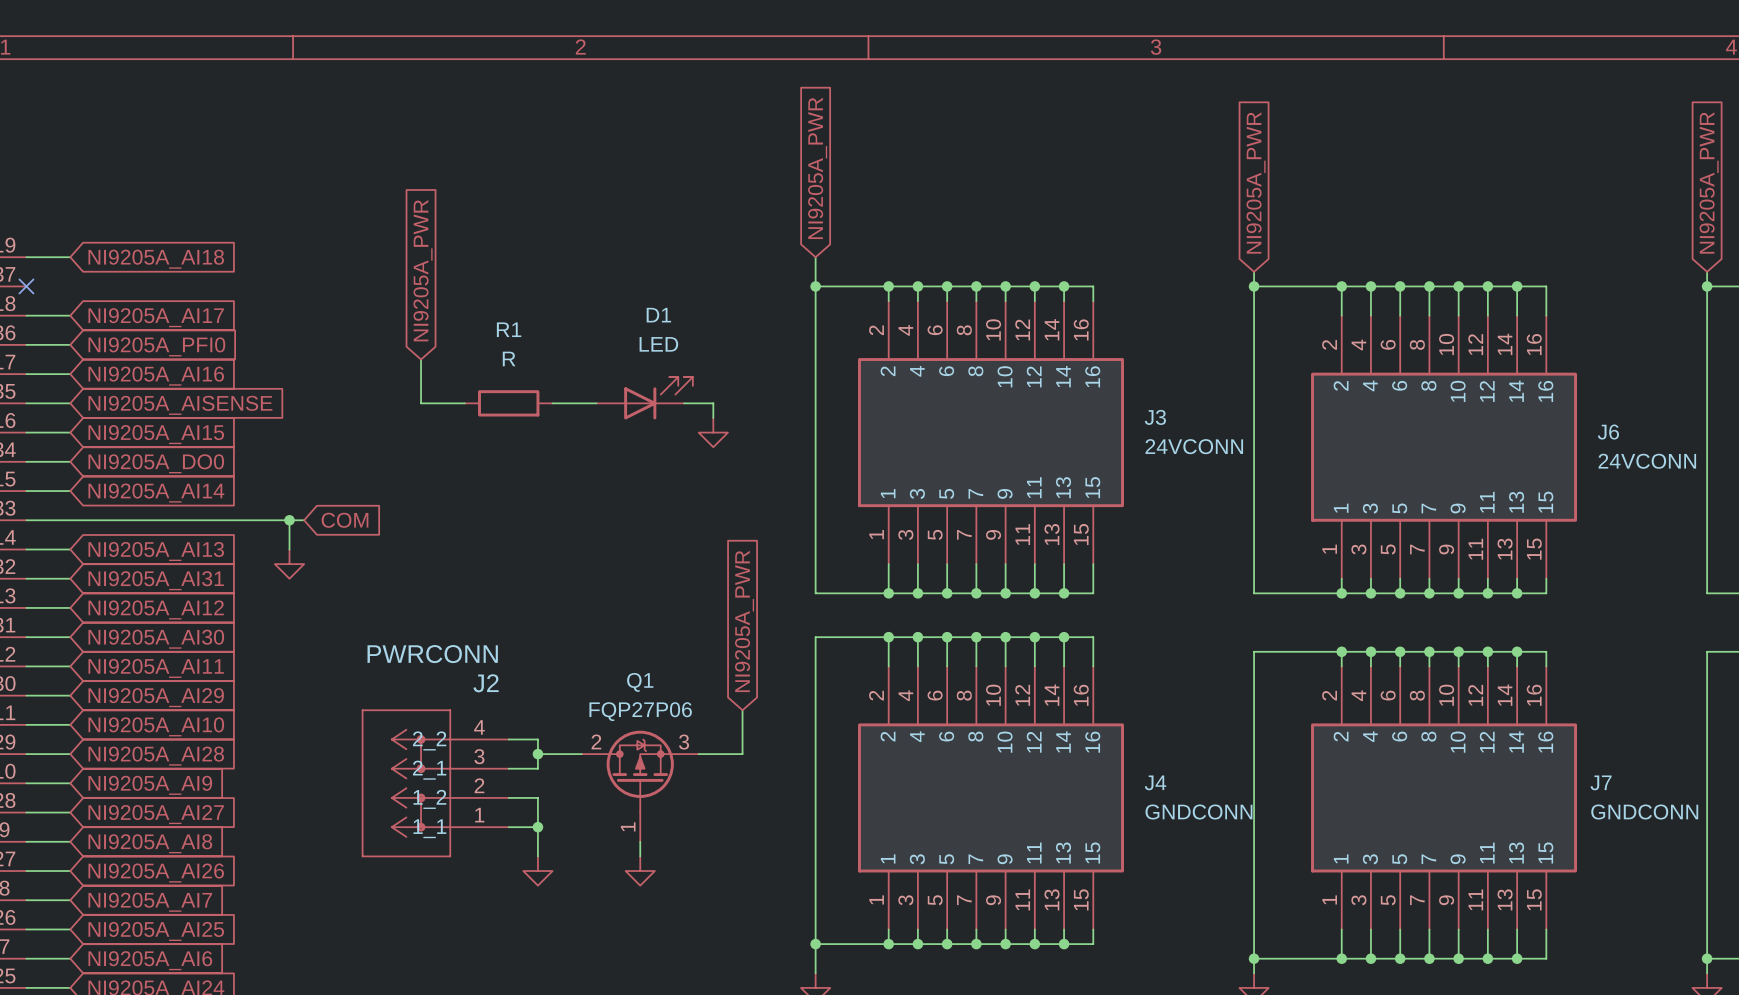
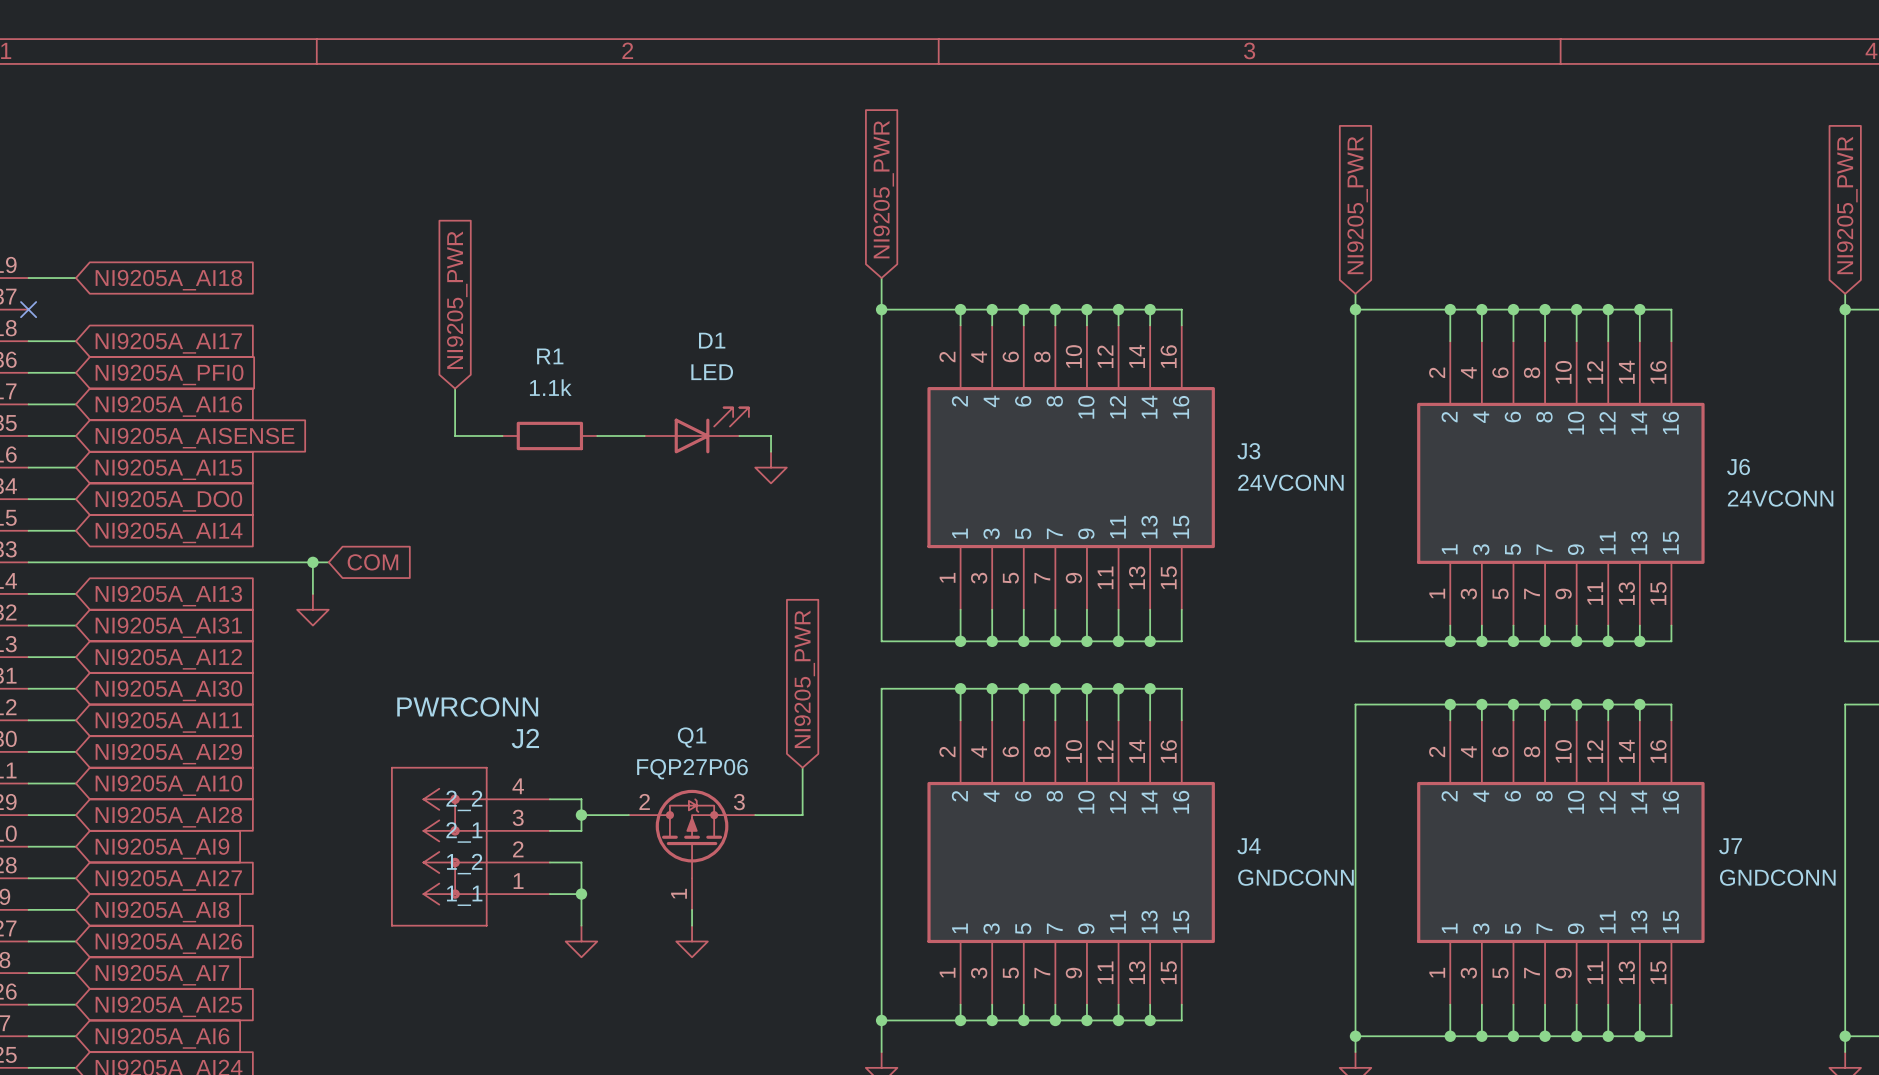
global label: NI9205A_PWR (817, 168) -> NI9205_PWR (883, 189)
global label: NI9205A_PWR (1256, 182) -> NI9205_PWR (1357, 205)
global label: NI9205A_PWR (1709, 182) -> NI9205_PWR (1847, 205)
global label: NI9205A_PWR (423, 270) -> NI9205_PWR (457, 300)
R1 value: R (509, 358) -> 1.1k (550, 387)
global label: NI9205A_PWR (744, 621) -> NI9205_PWR (804, 679)

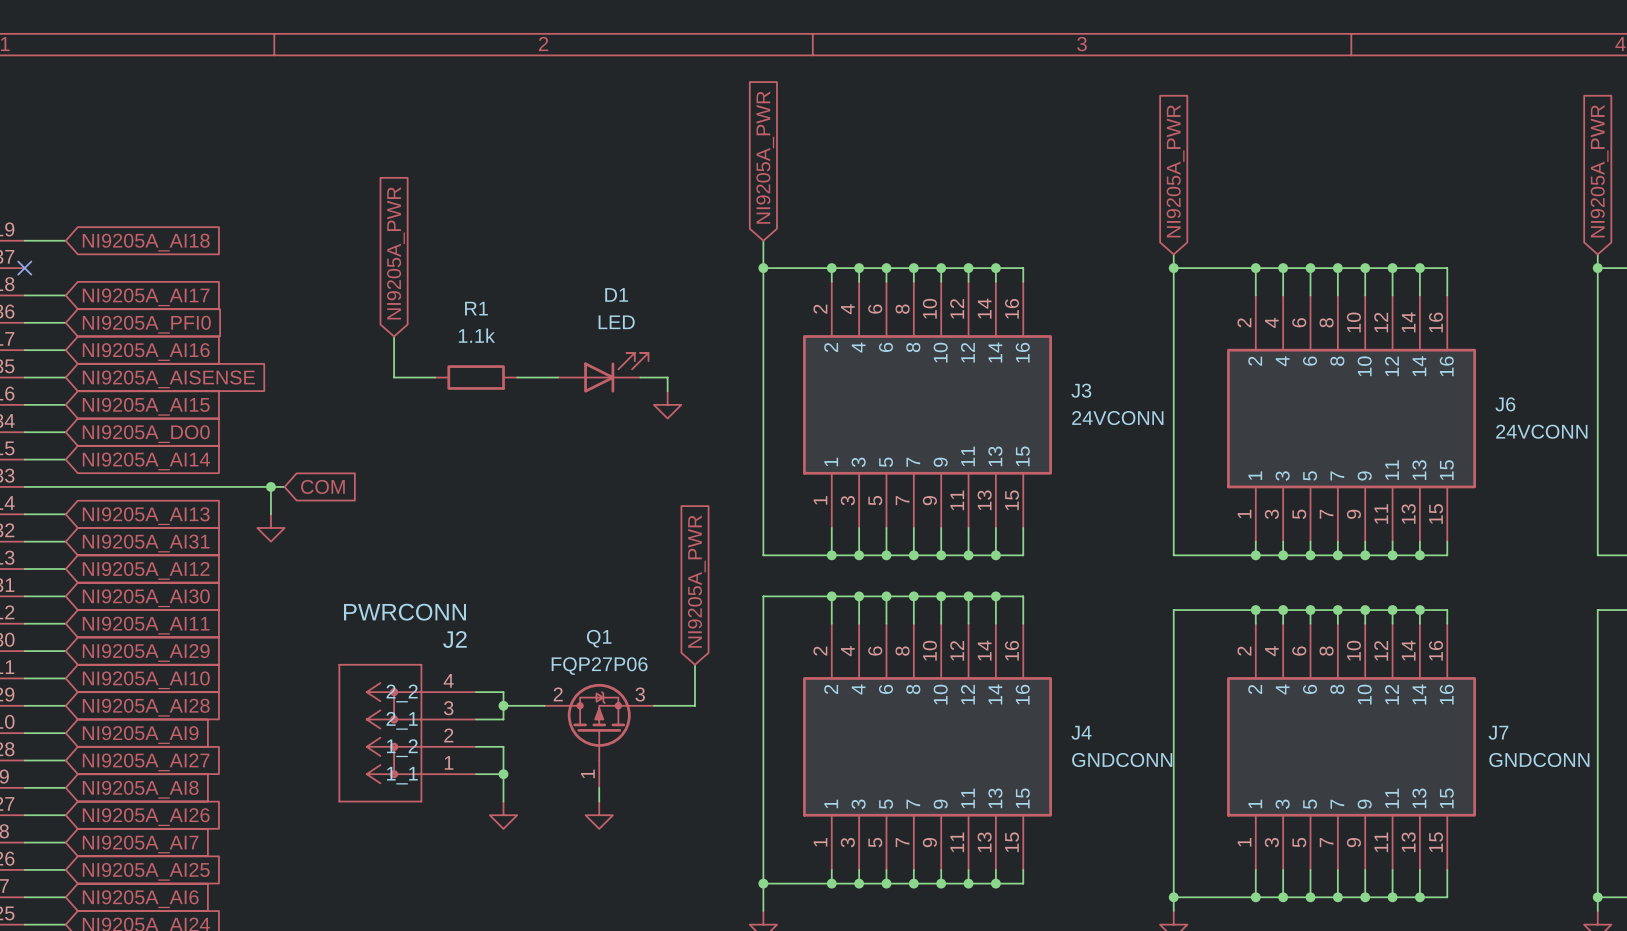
global label: NI9205_PWR (883, 189) -> NI9205A_PWR (765, 157)
global label: NI9205_PWR (1357, 205) -> NI9205A_PWR (1175, 171)
global label: NI9205_PWR (1847, 205) -> NI9205A_PWR (1599, 171)
global label: NI9205_PWR (457, 300) -> NI9205A_PWR (395, 253)
global label: NI9205_PWR (804, 679) -> NI9205A_PWR (696, 581)

